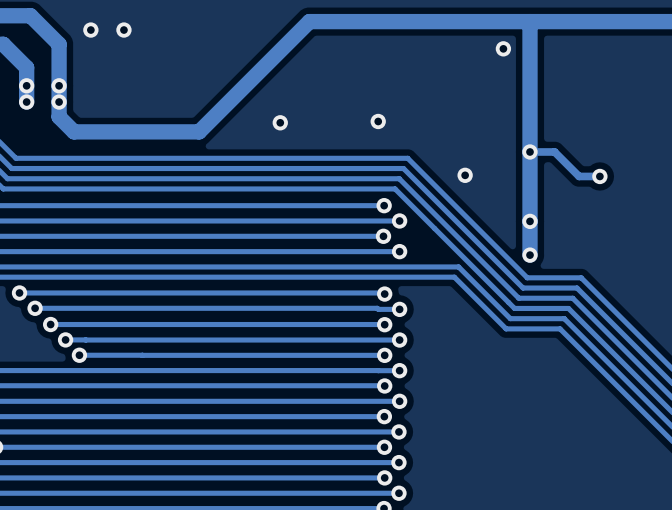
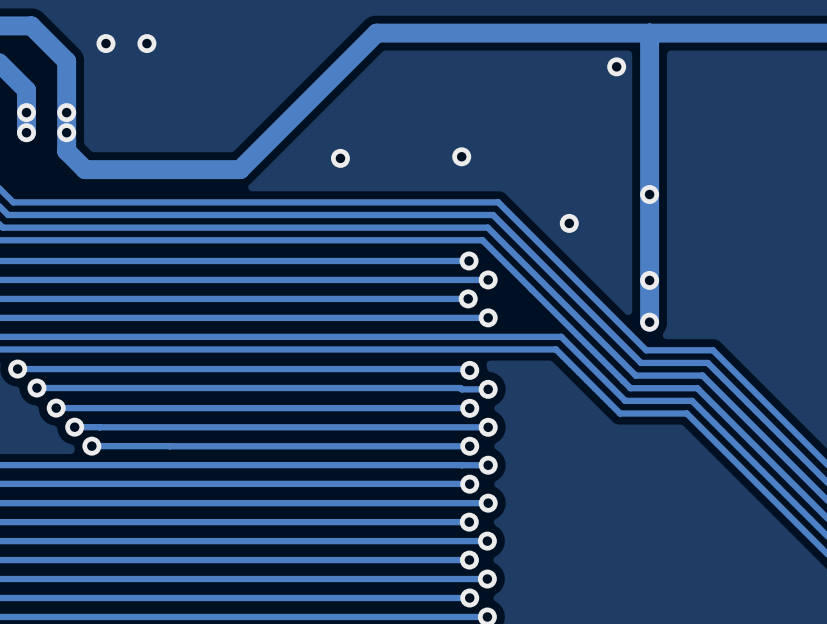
track: (530, 151) (554, 151) (579, 176) (599, 176) -> none
via: (599, 176) -> none

